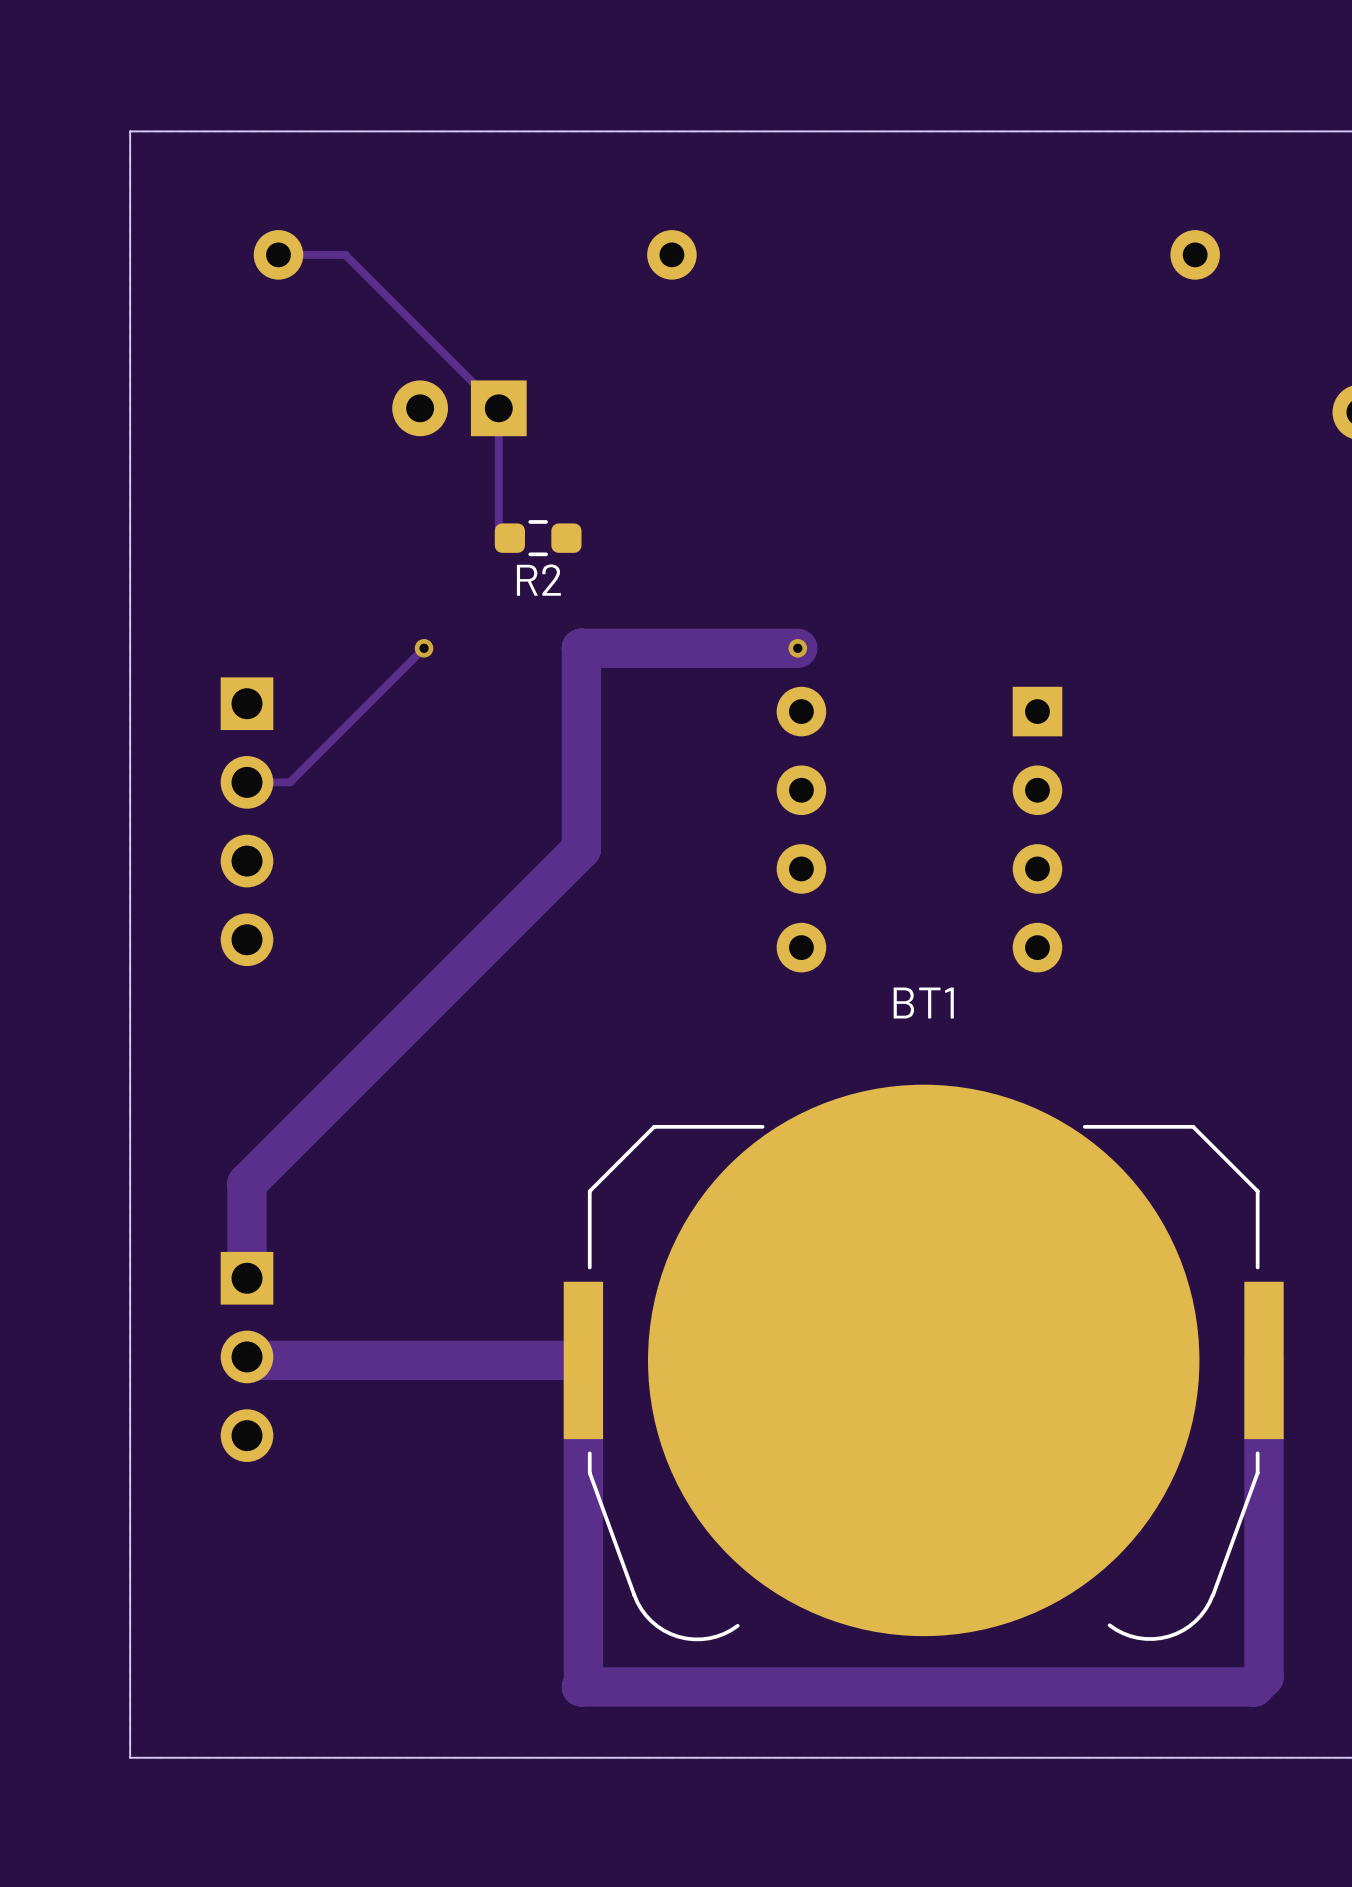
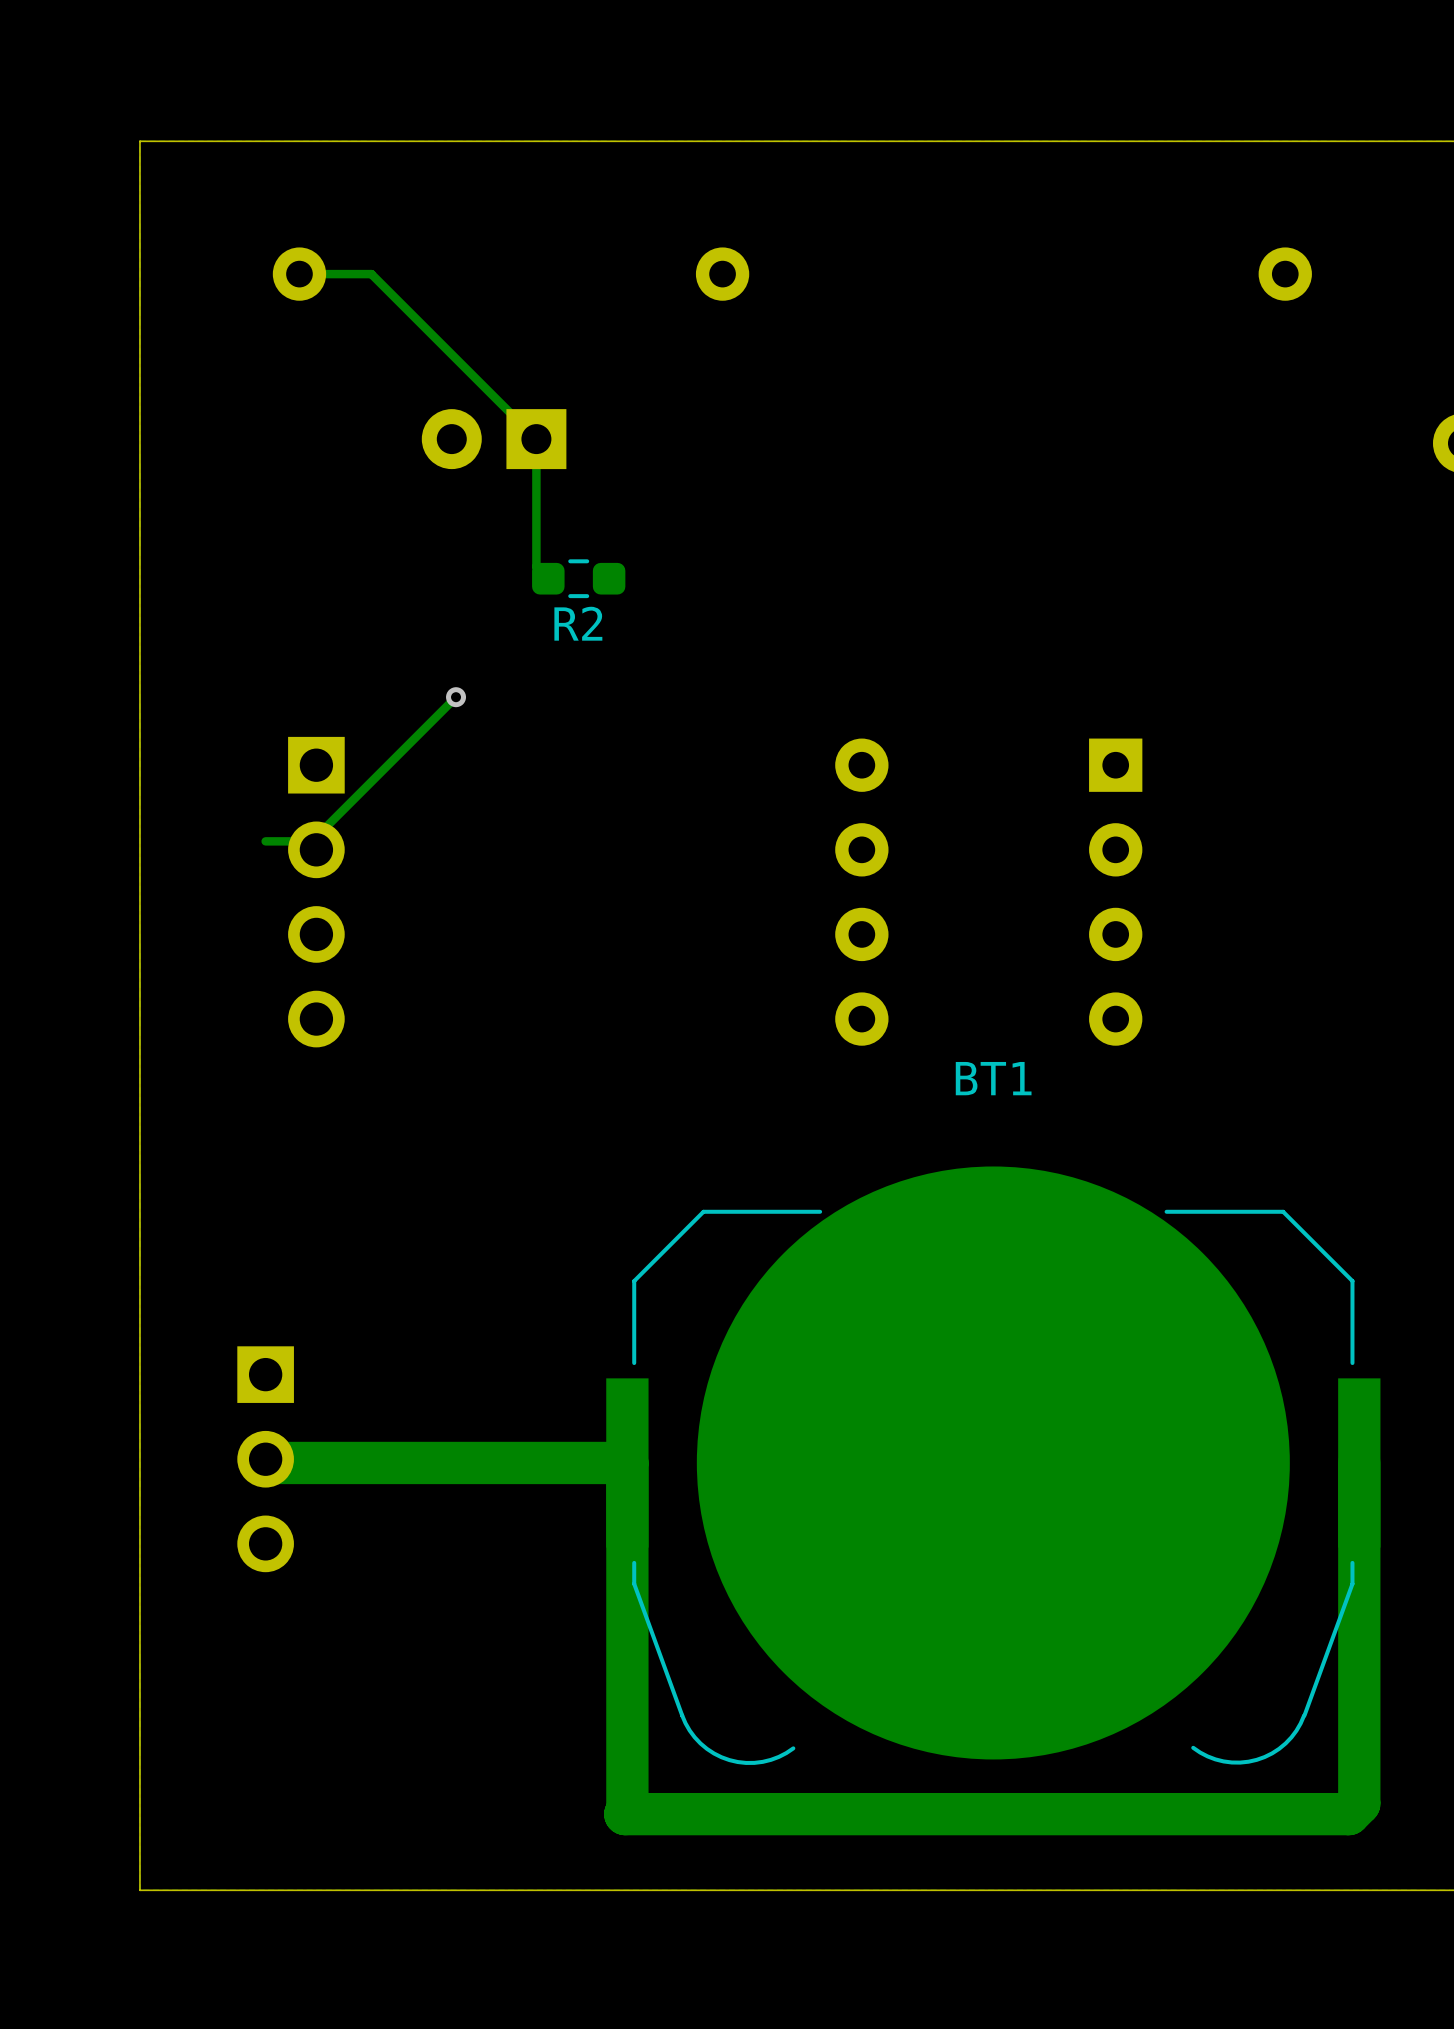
track: (581, 648) (581, 848) (247, 1183) (247, 1278) -> none
track: (797, 648) (581, 648) -> none
via: (797, 648) -> none
part position: (247, 821) -> (316, 892)

